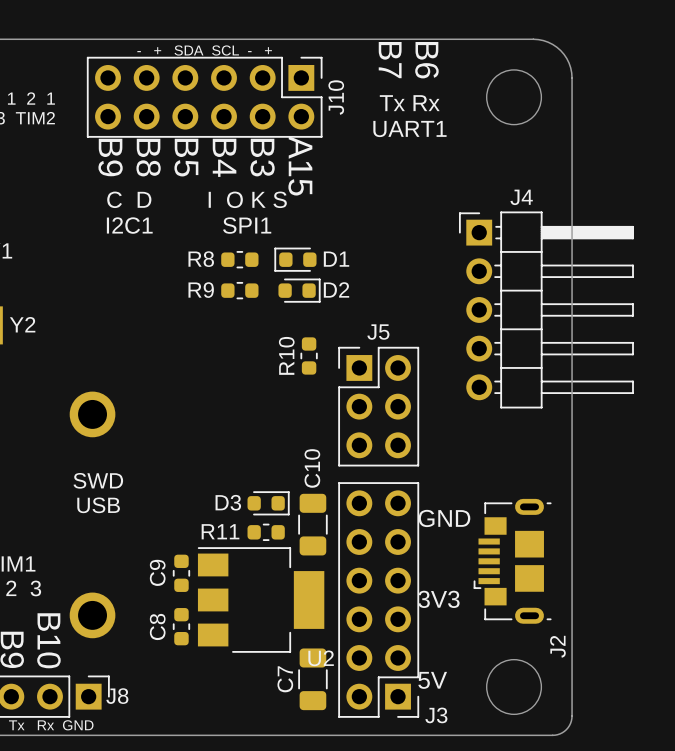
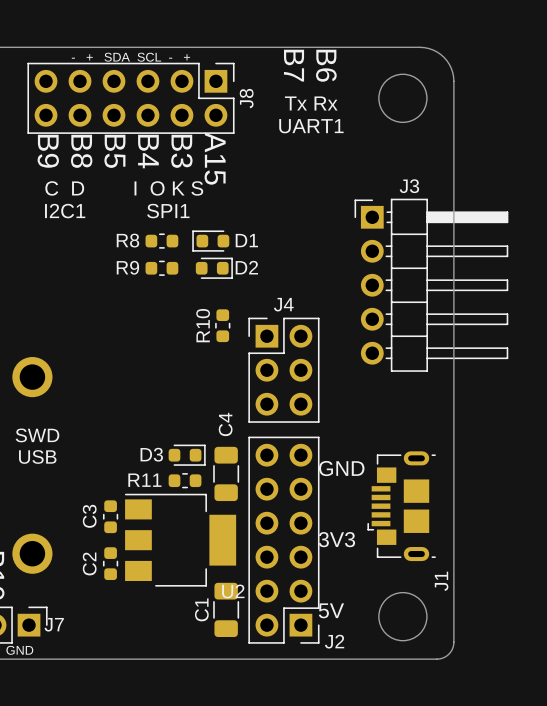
J10 name: J10 (336, 97) -> J8 (246, 98)
J4 name: J4 (521, 197) -> J3 (409, 186)
J5 name: J5 (378, 332) -> J4 (283, 304)
C10 name: C10 (312, 468) -> C4 (225, 424)
C9 name: C9 (157, 572) -> C3 (89, 516)
C8 name: C8 (157, 626) -> C2 (89, 563)
J2 name: J2 (557, 646) -> J1 (441, 581)
C7 name: C7 (285, 679) -> C1 (201, 609)
J8 name: J8 (117, 696) -> J7 (54, 624)
J3 name: J3 (436, 715) -> J2 (334, 641)

